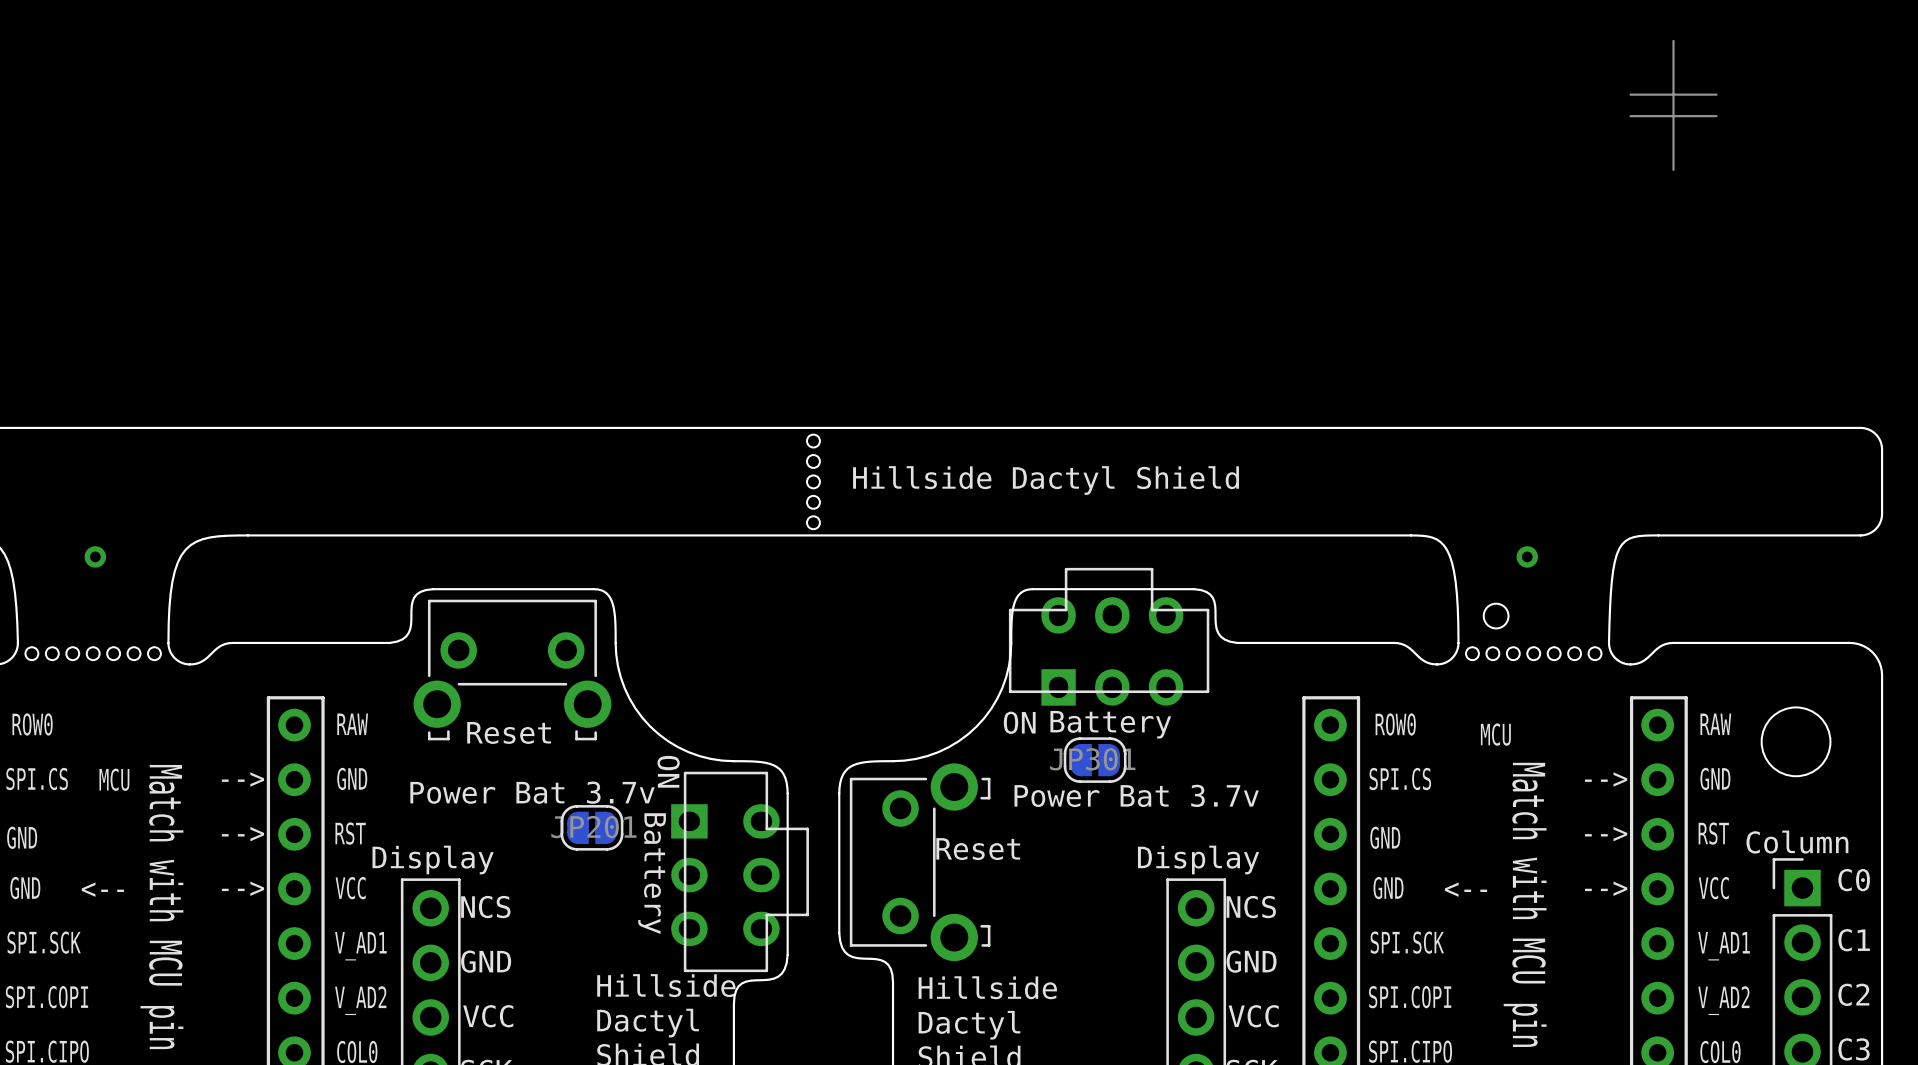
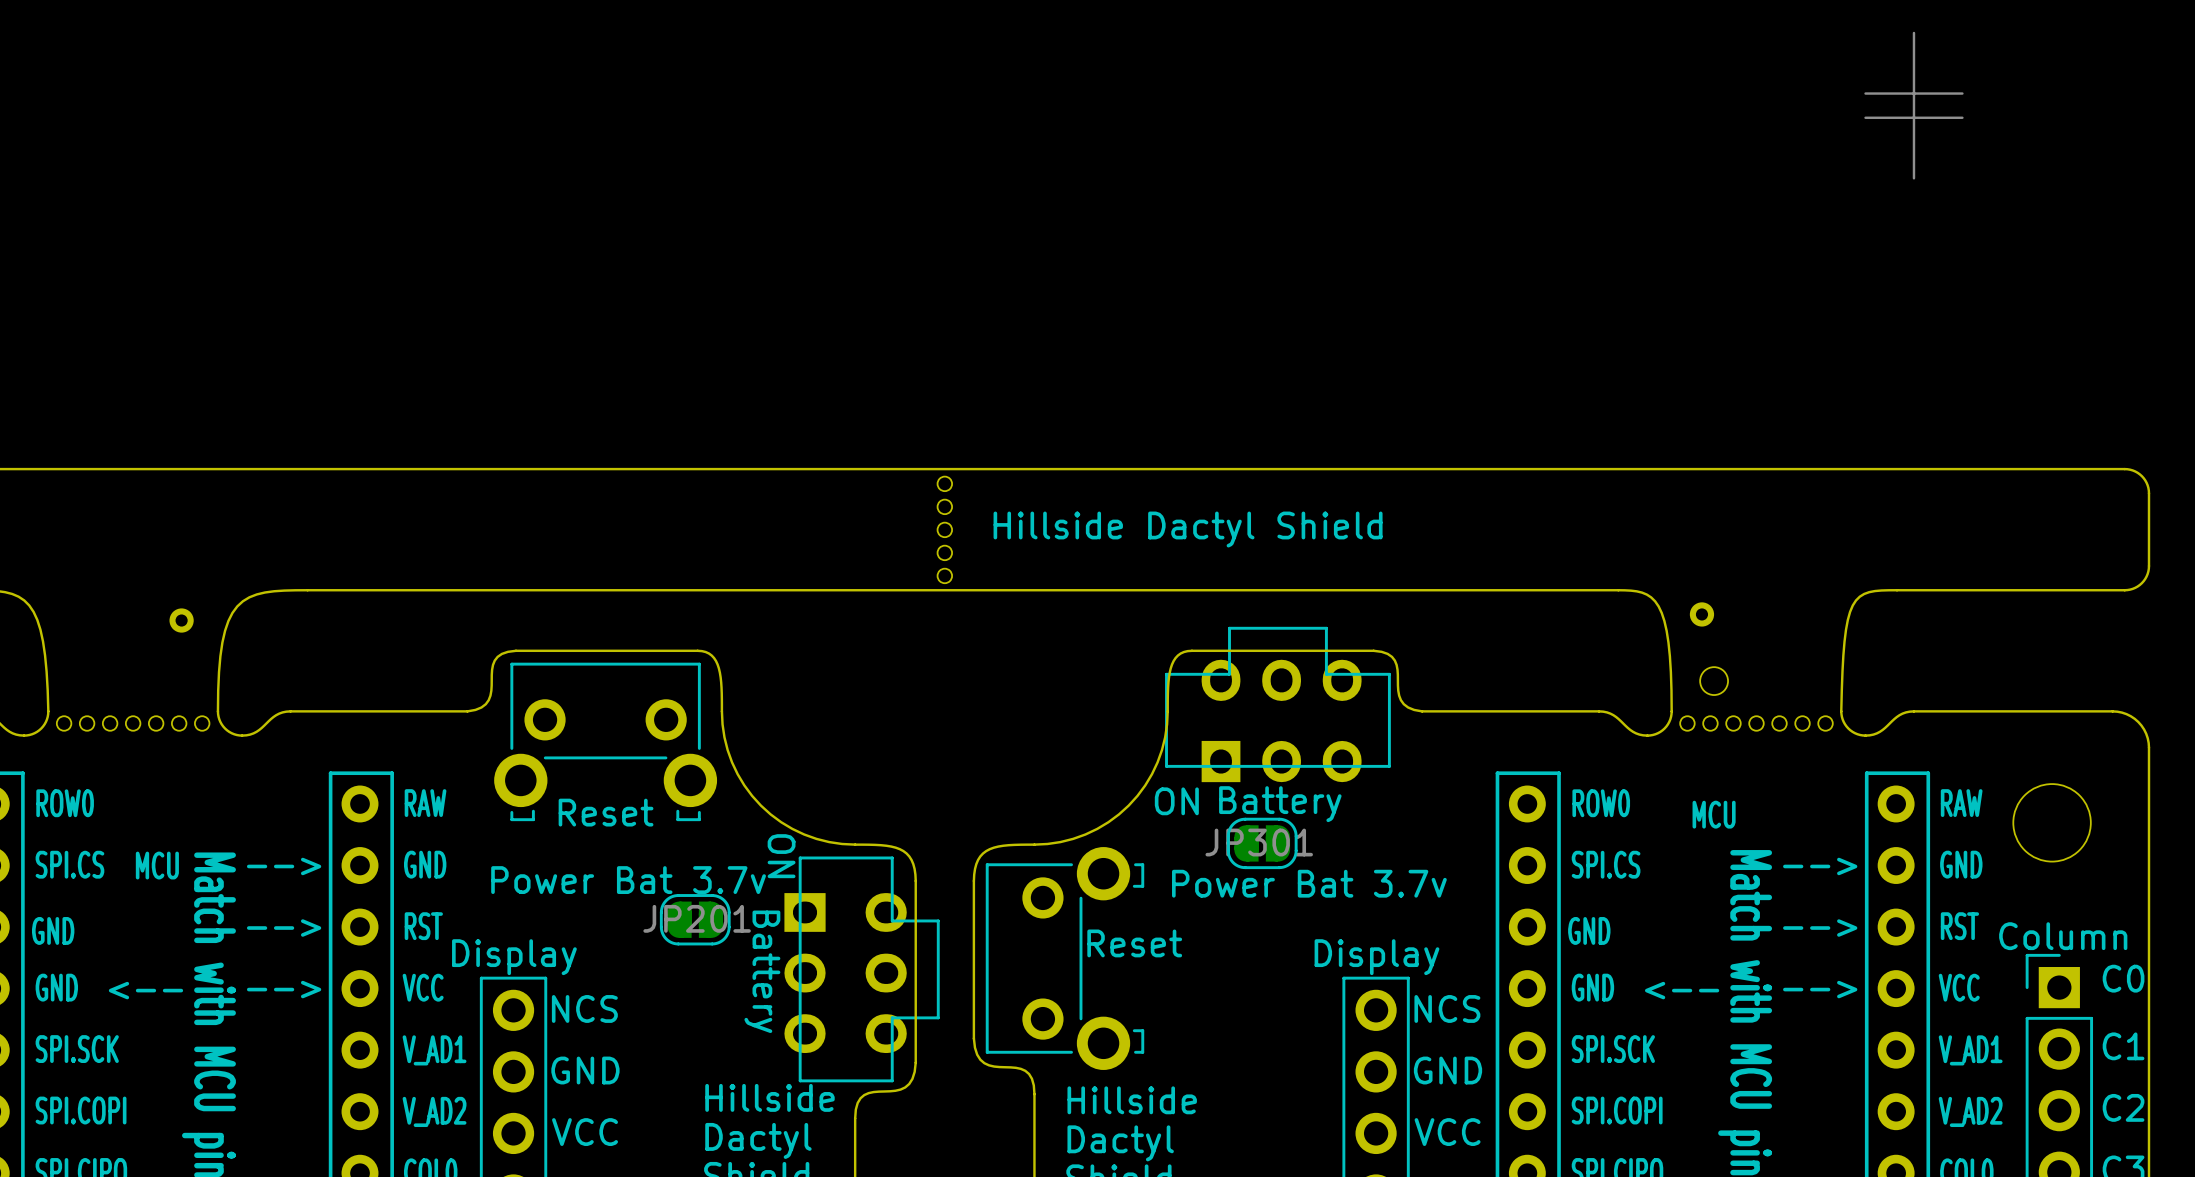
part position: (95, 556) -> (181, 620)
part position: (1527, 556) -> (1701, 614)

